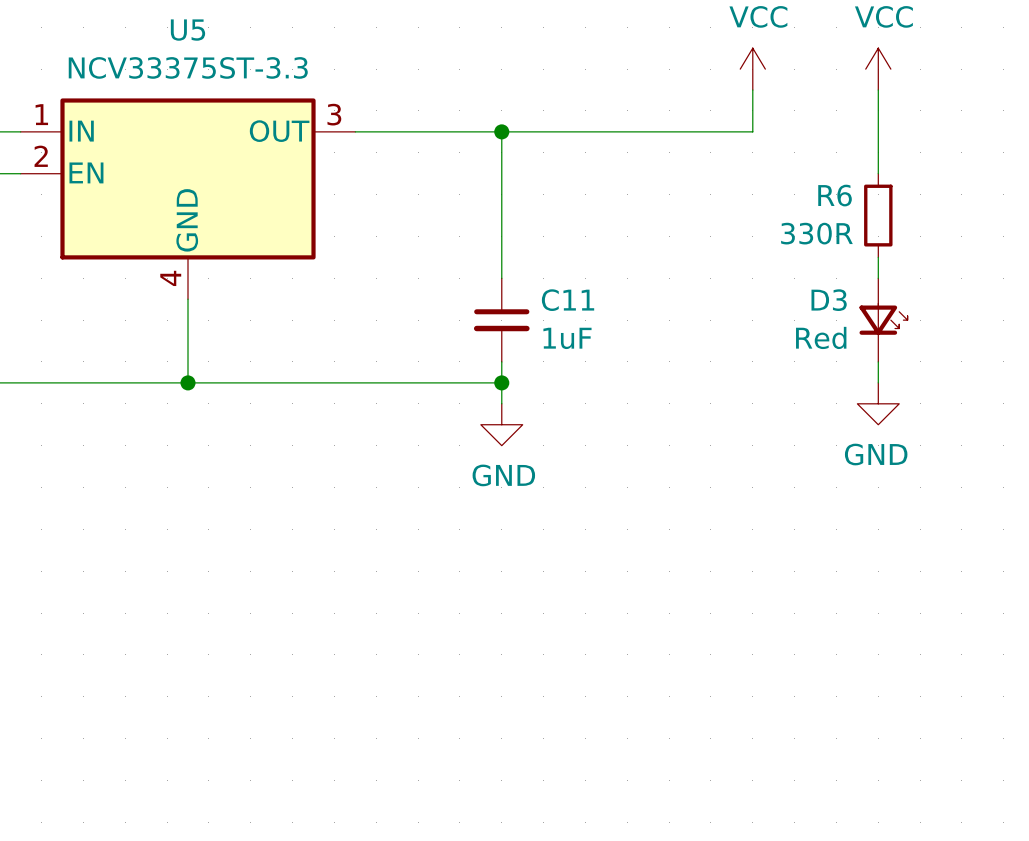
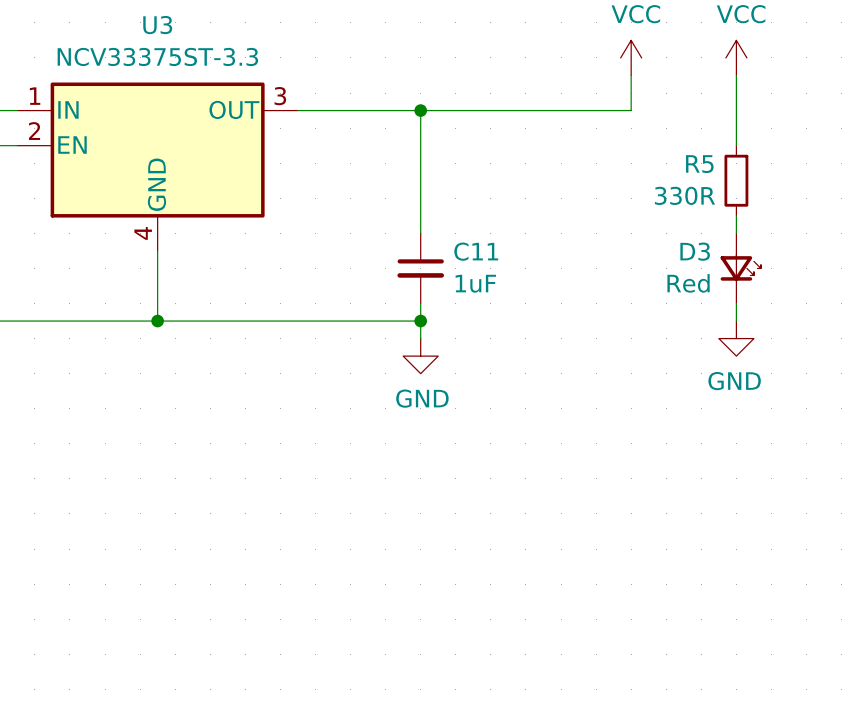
U5 name: U5 (187, 30) -> U3 (157, 25)
R6 name: R6 (835, 195) -> R5 (699, 164)

